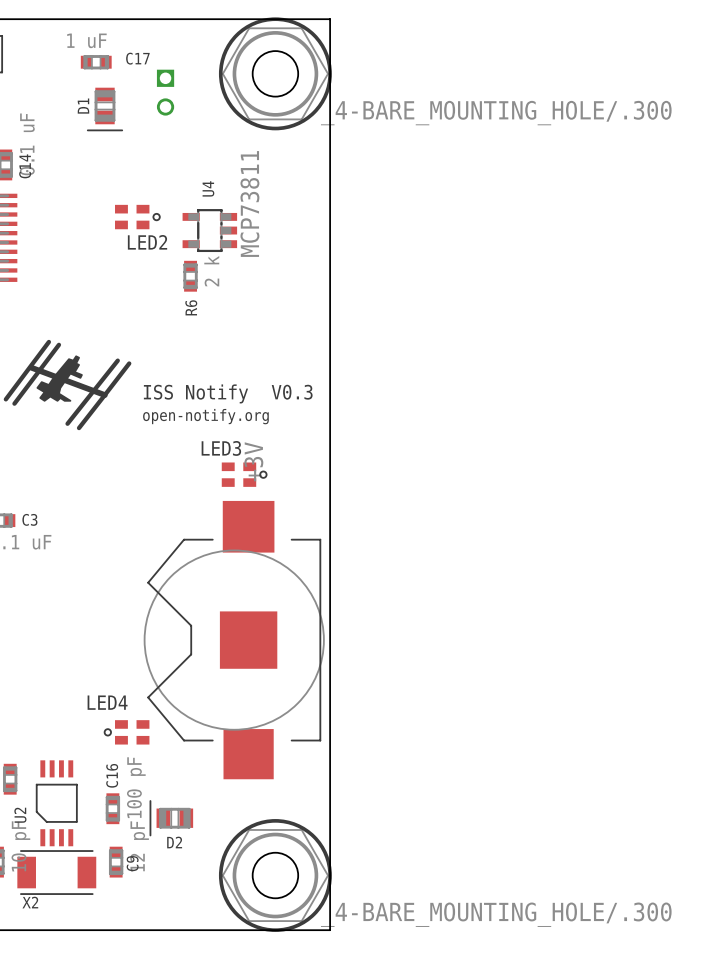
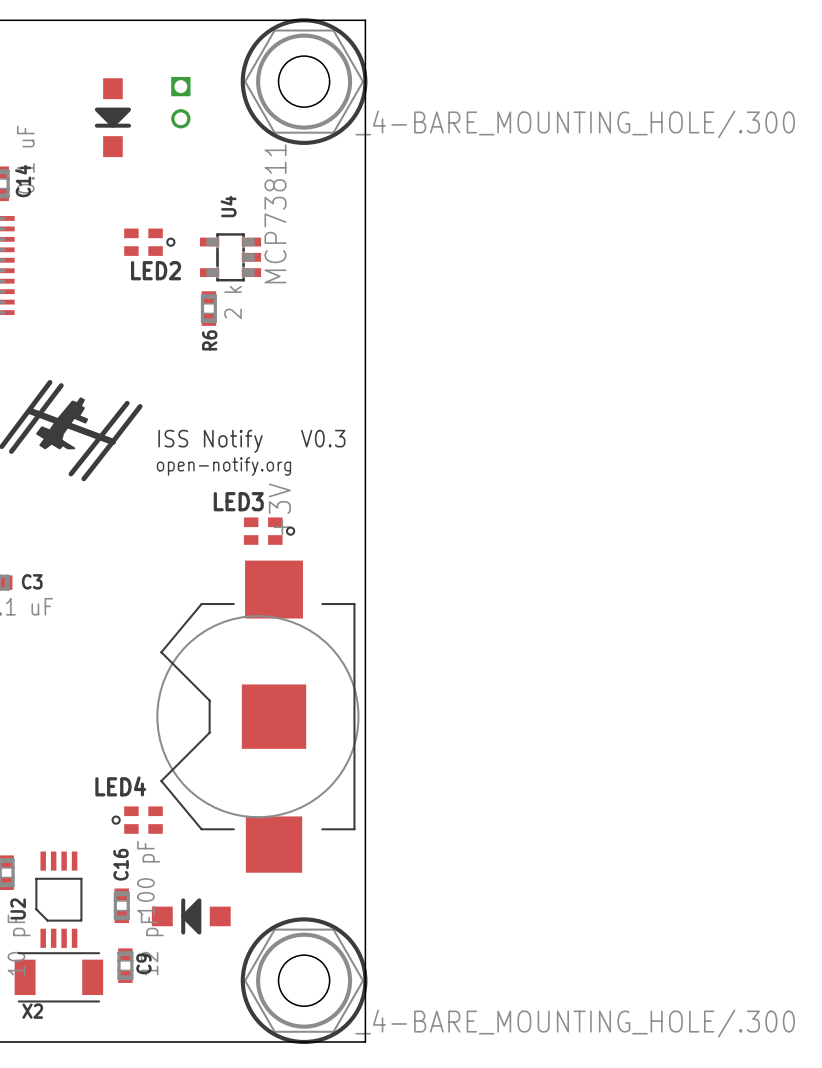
C17: 1 uF (96, 62) -> none
part: none -> (112, 117)
D1: (104, 109) -> none
D2: (171, 818) -> none
part: none -> (191, 916)

